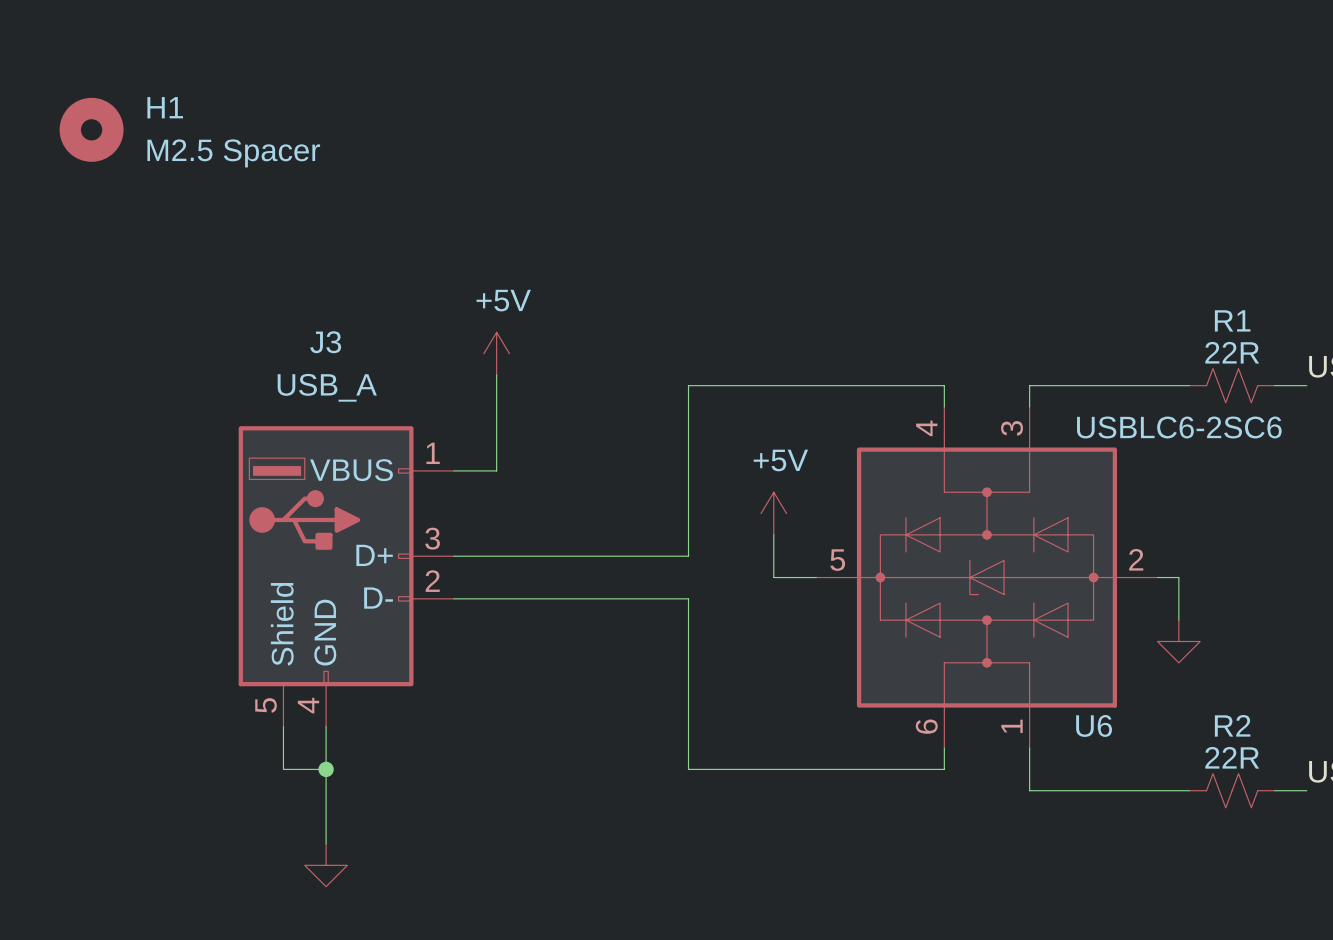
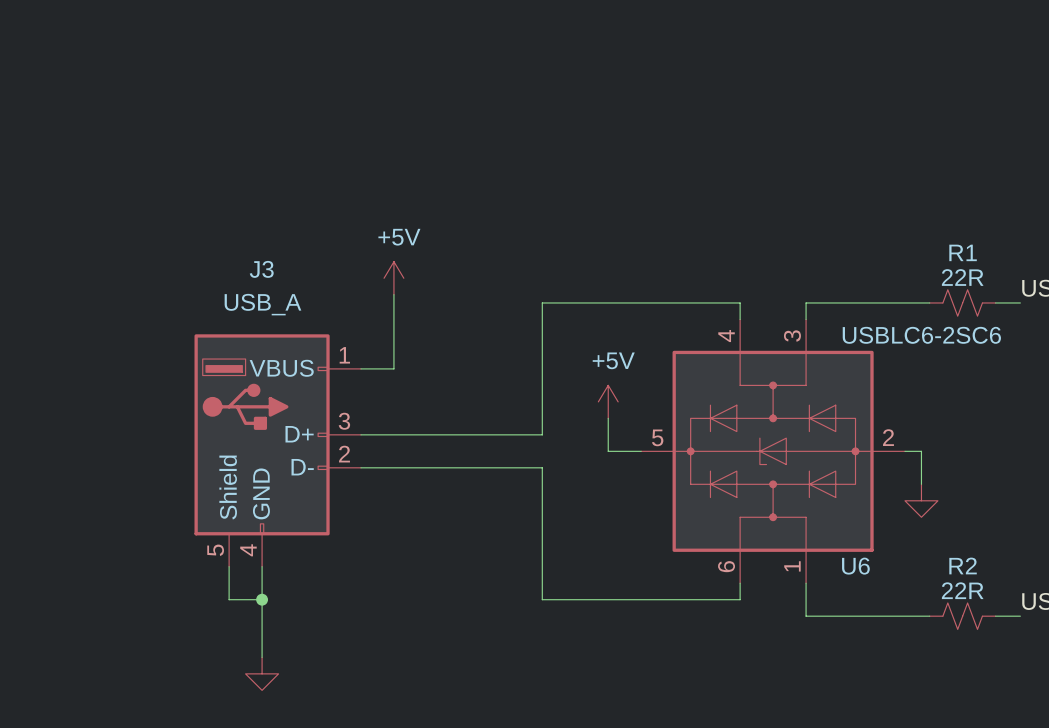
H1: M2.5 Spacer (91, 129) -> none

